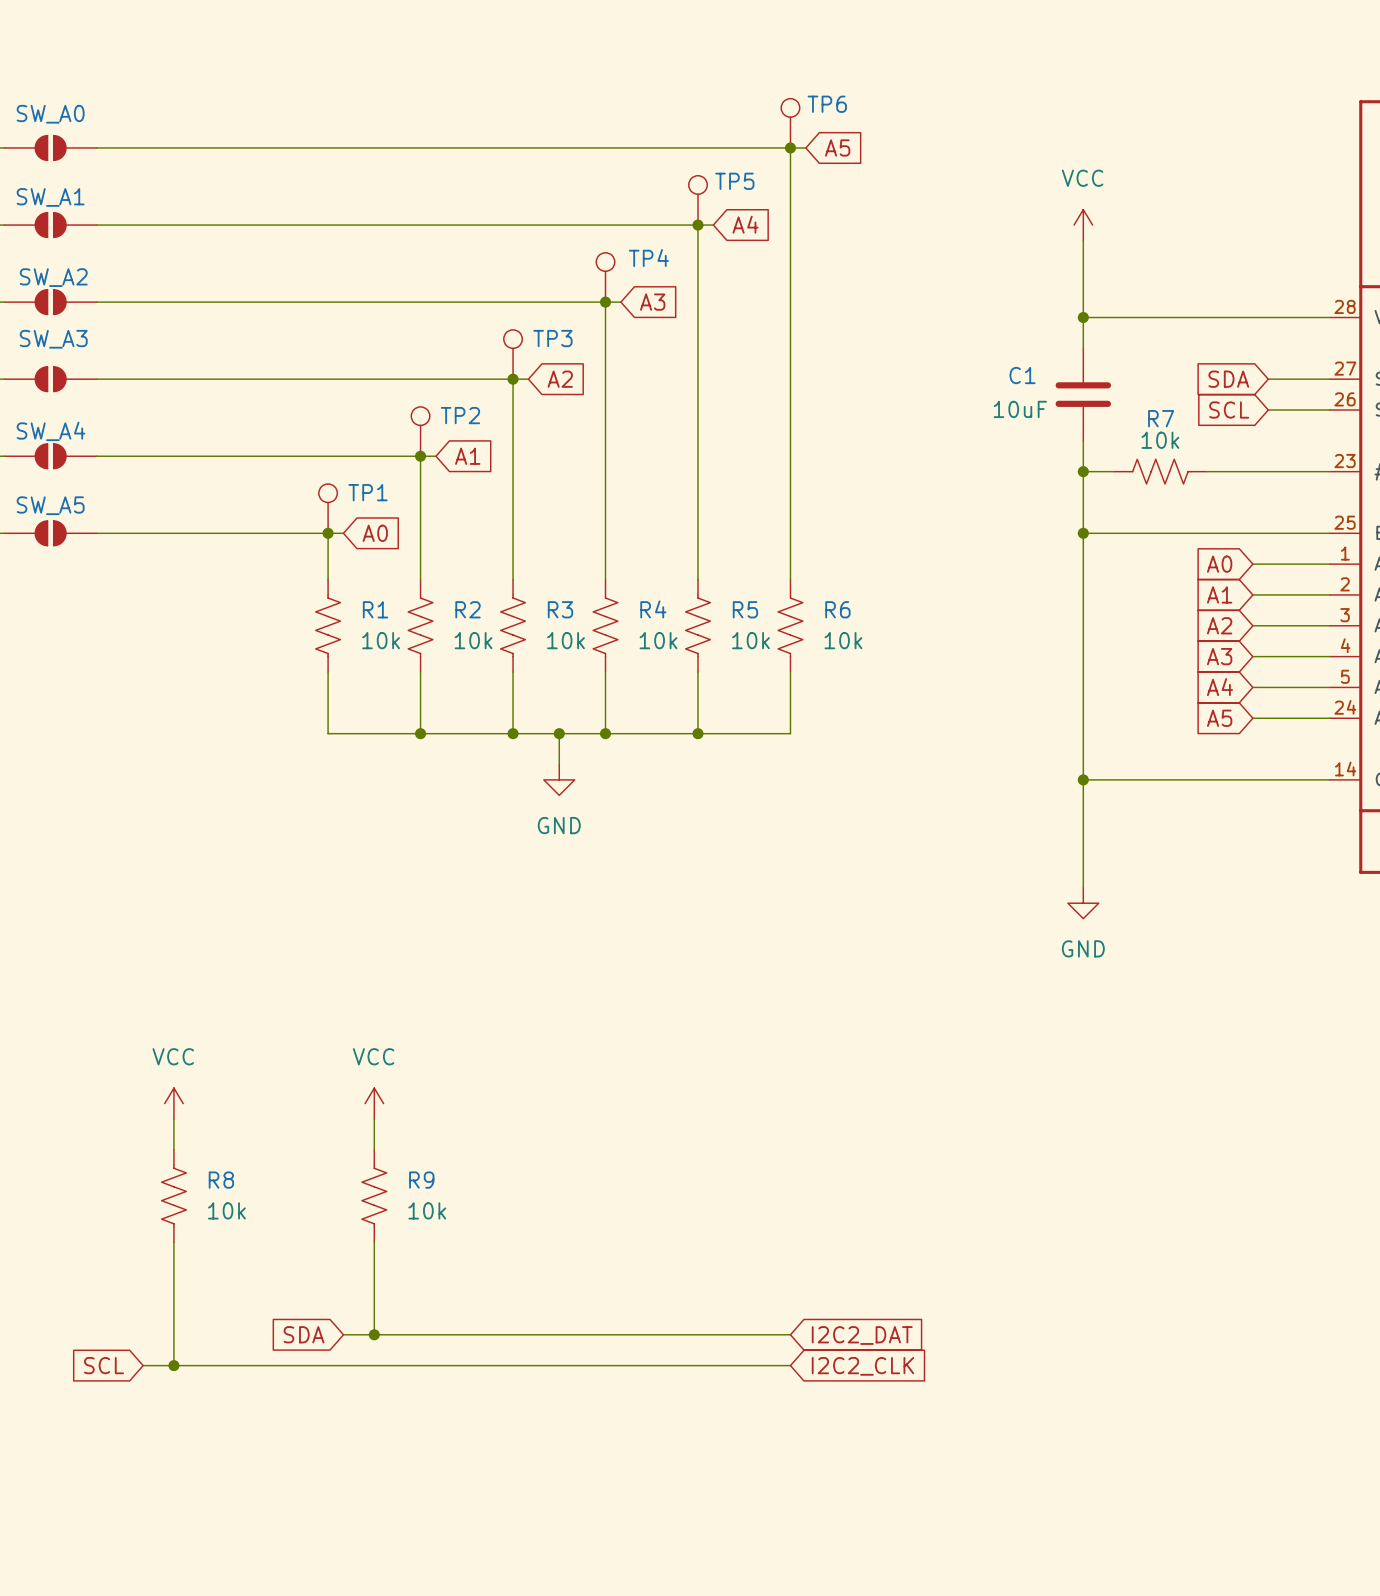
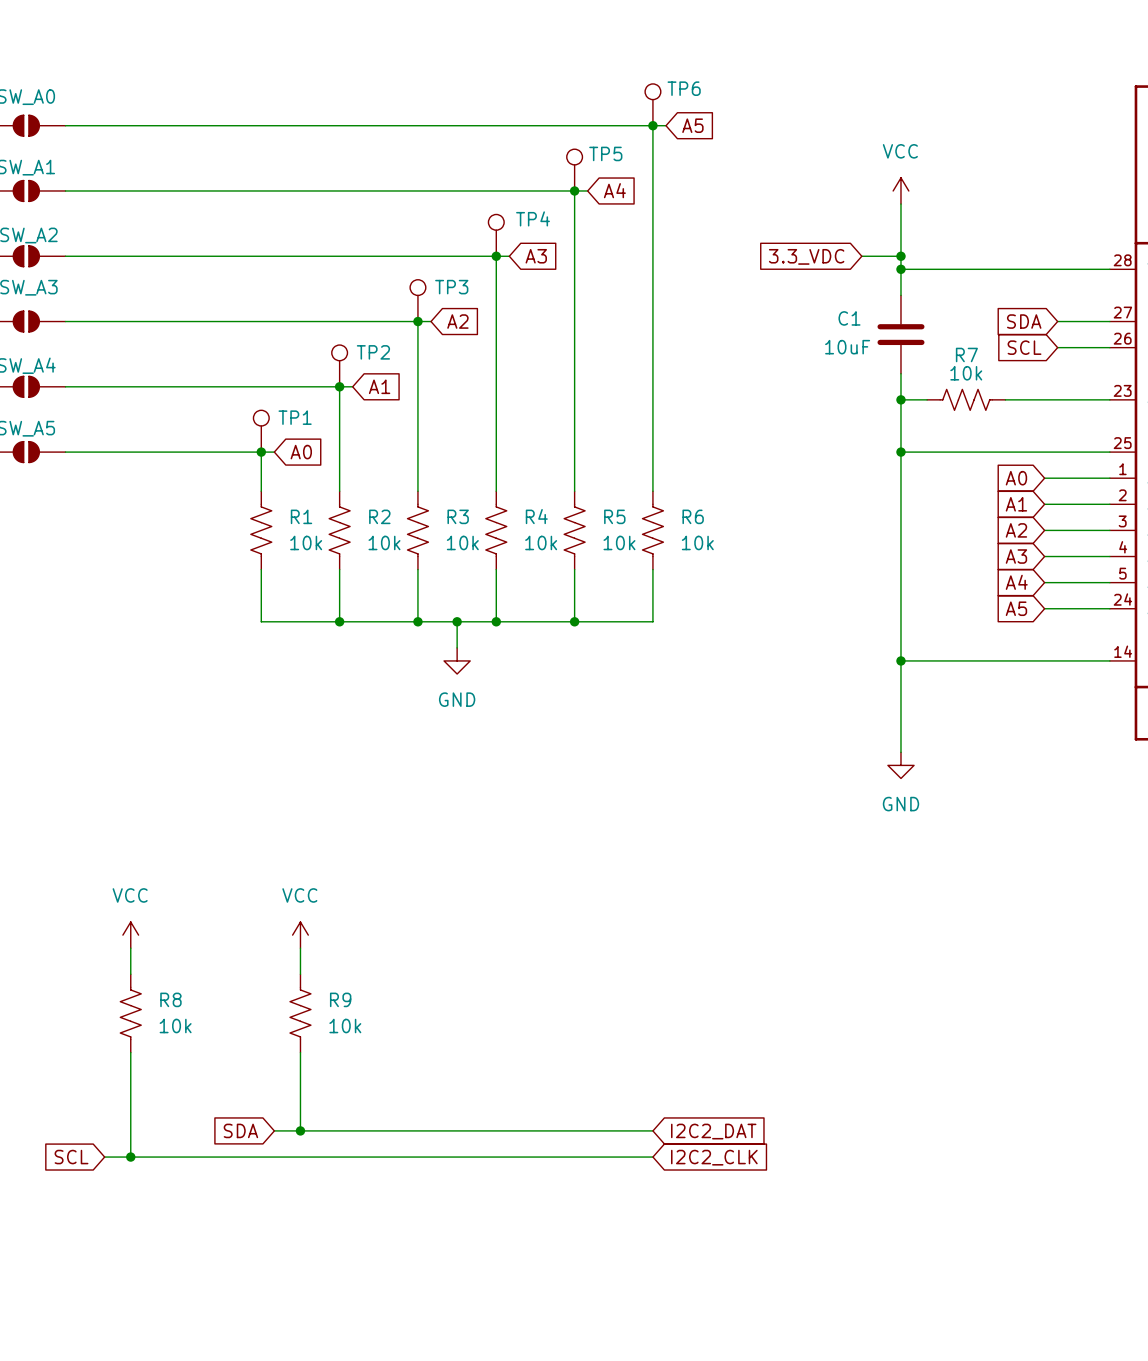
global label: none -> 3.3_VDC (806, 256)
wire: none -> (861, 256) (900, 256)
junction: none -> (900, 256)

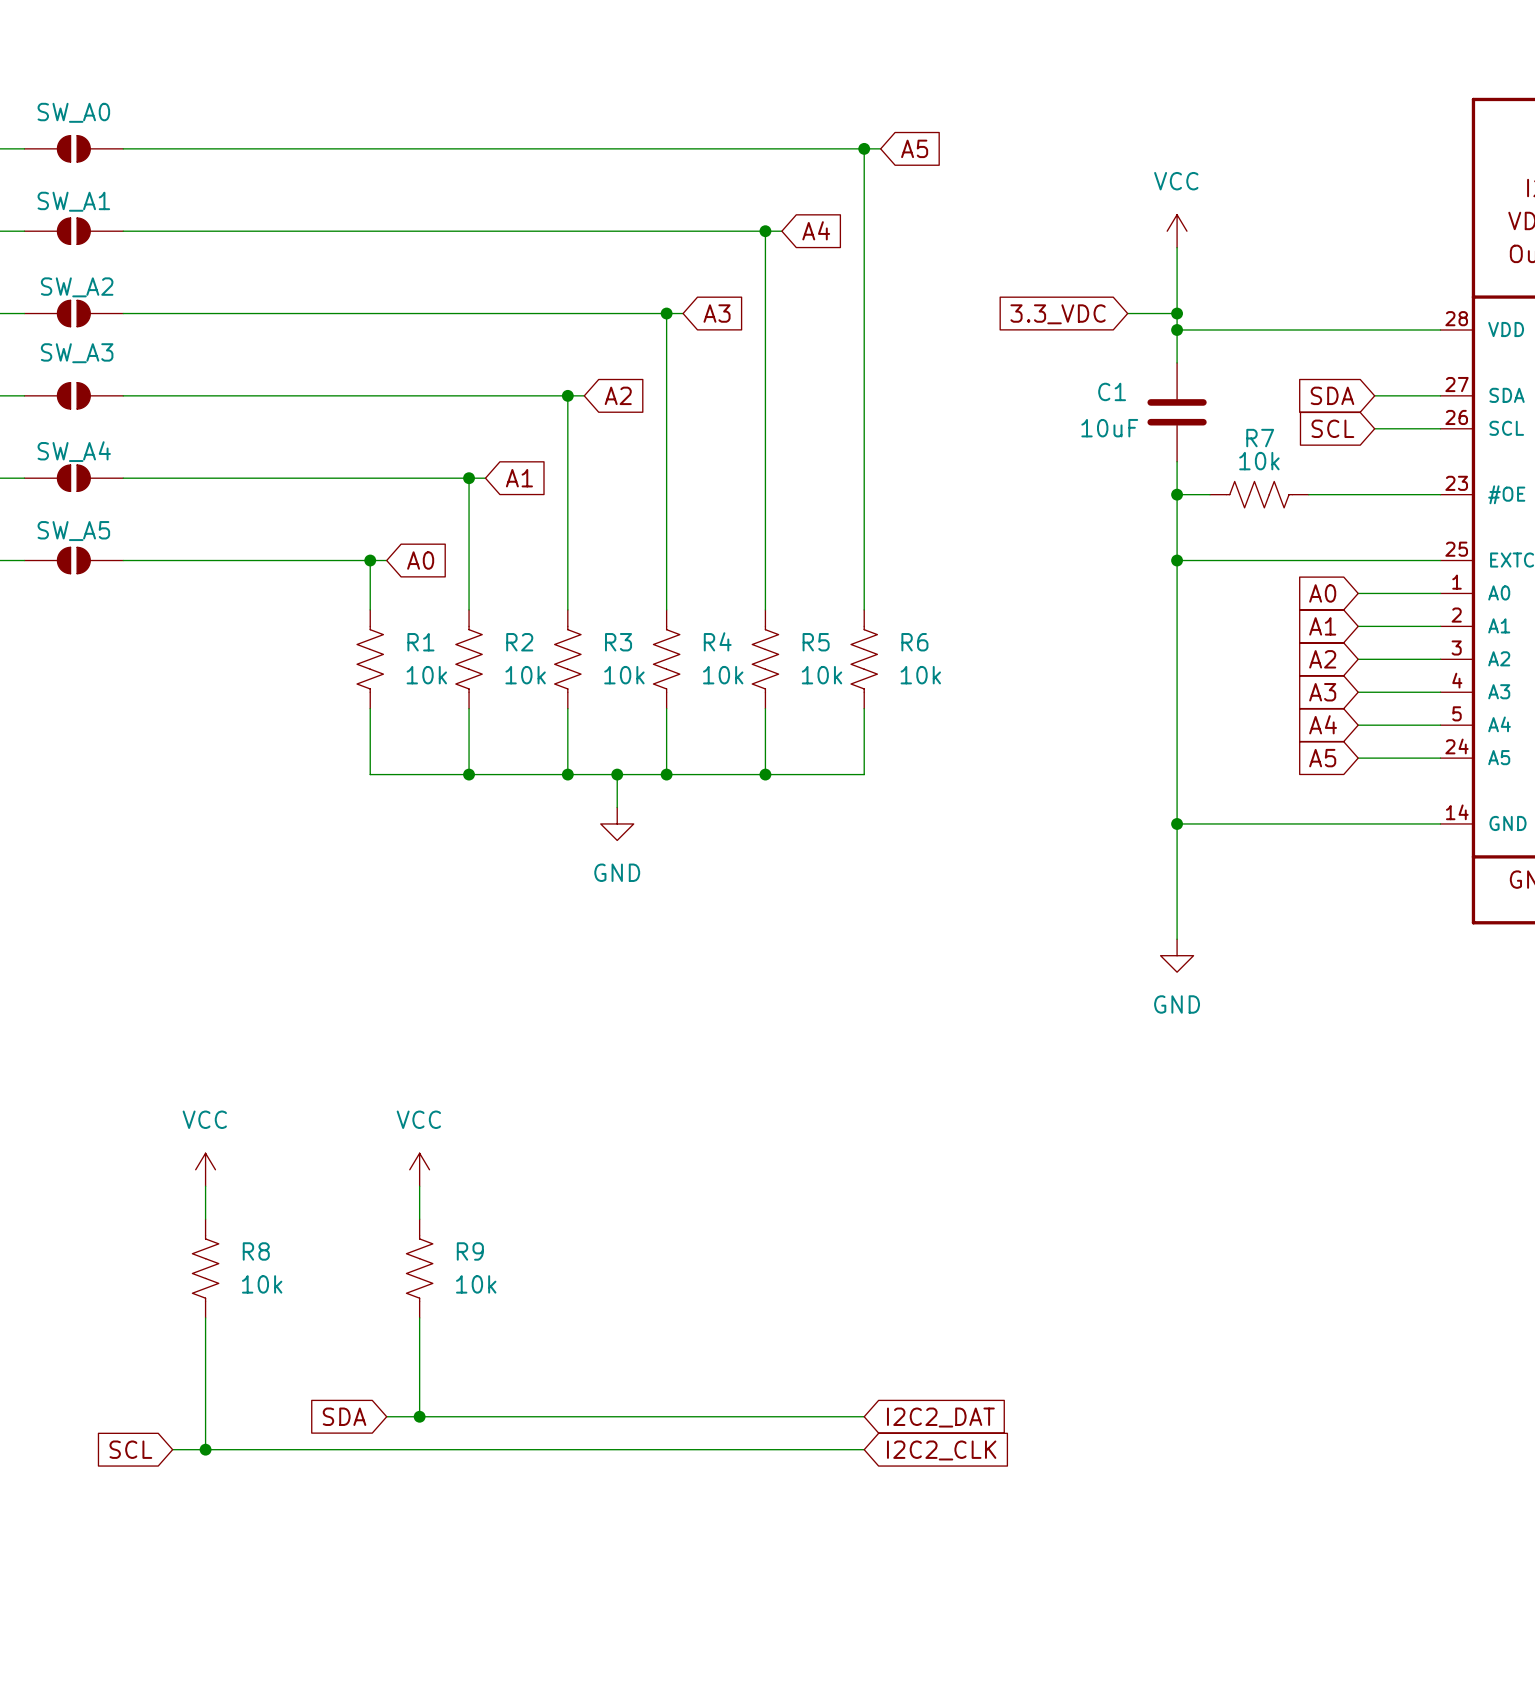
TP6: (652, 104) -> none
TP5: (574, 170) -> none
TP4: (496, 235) -> none
TP3: (417, 300) -> none
TP2: (339, 365) -> none
TP1: (261, 431) -> none

